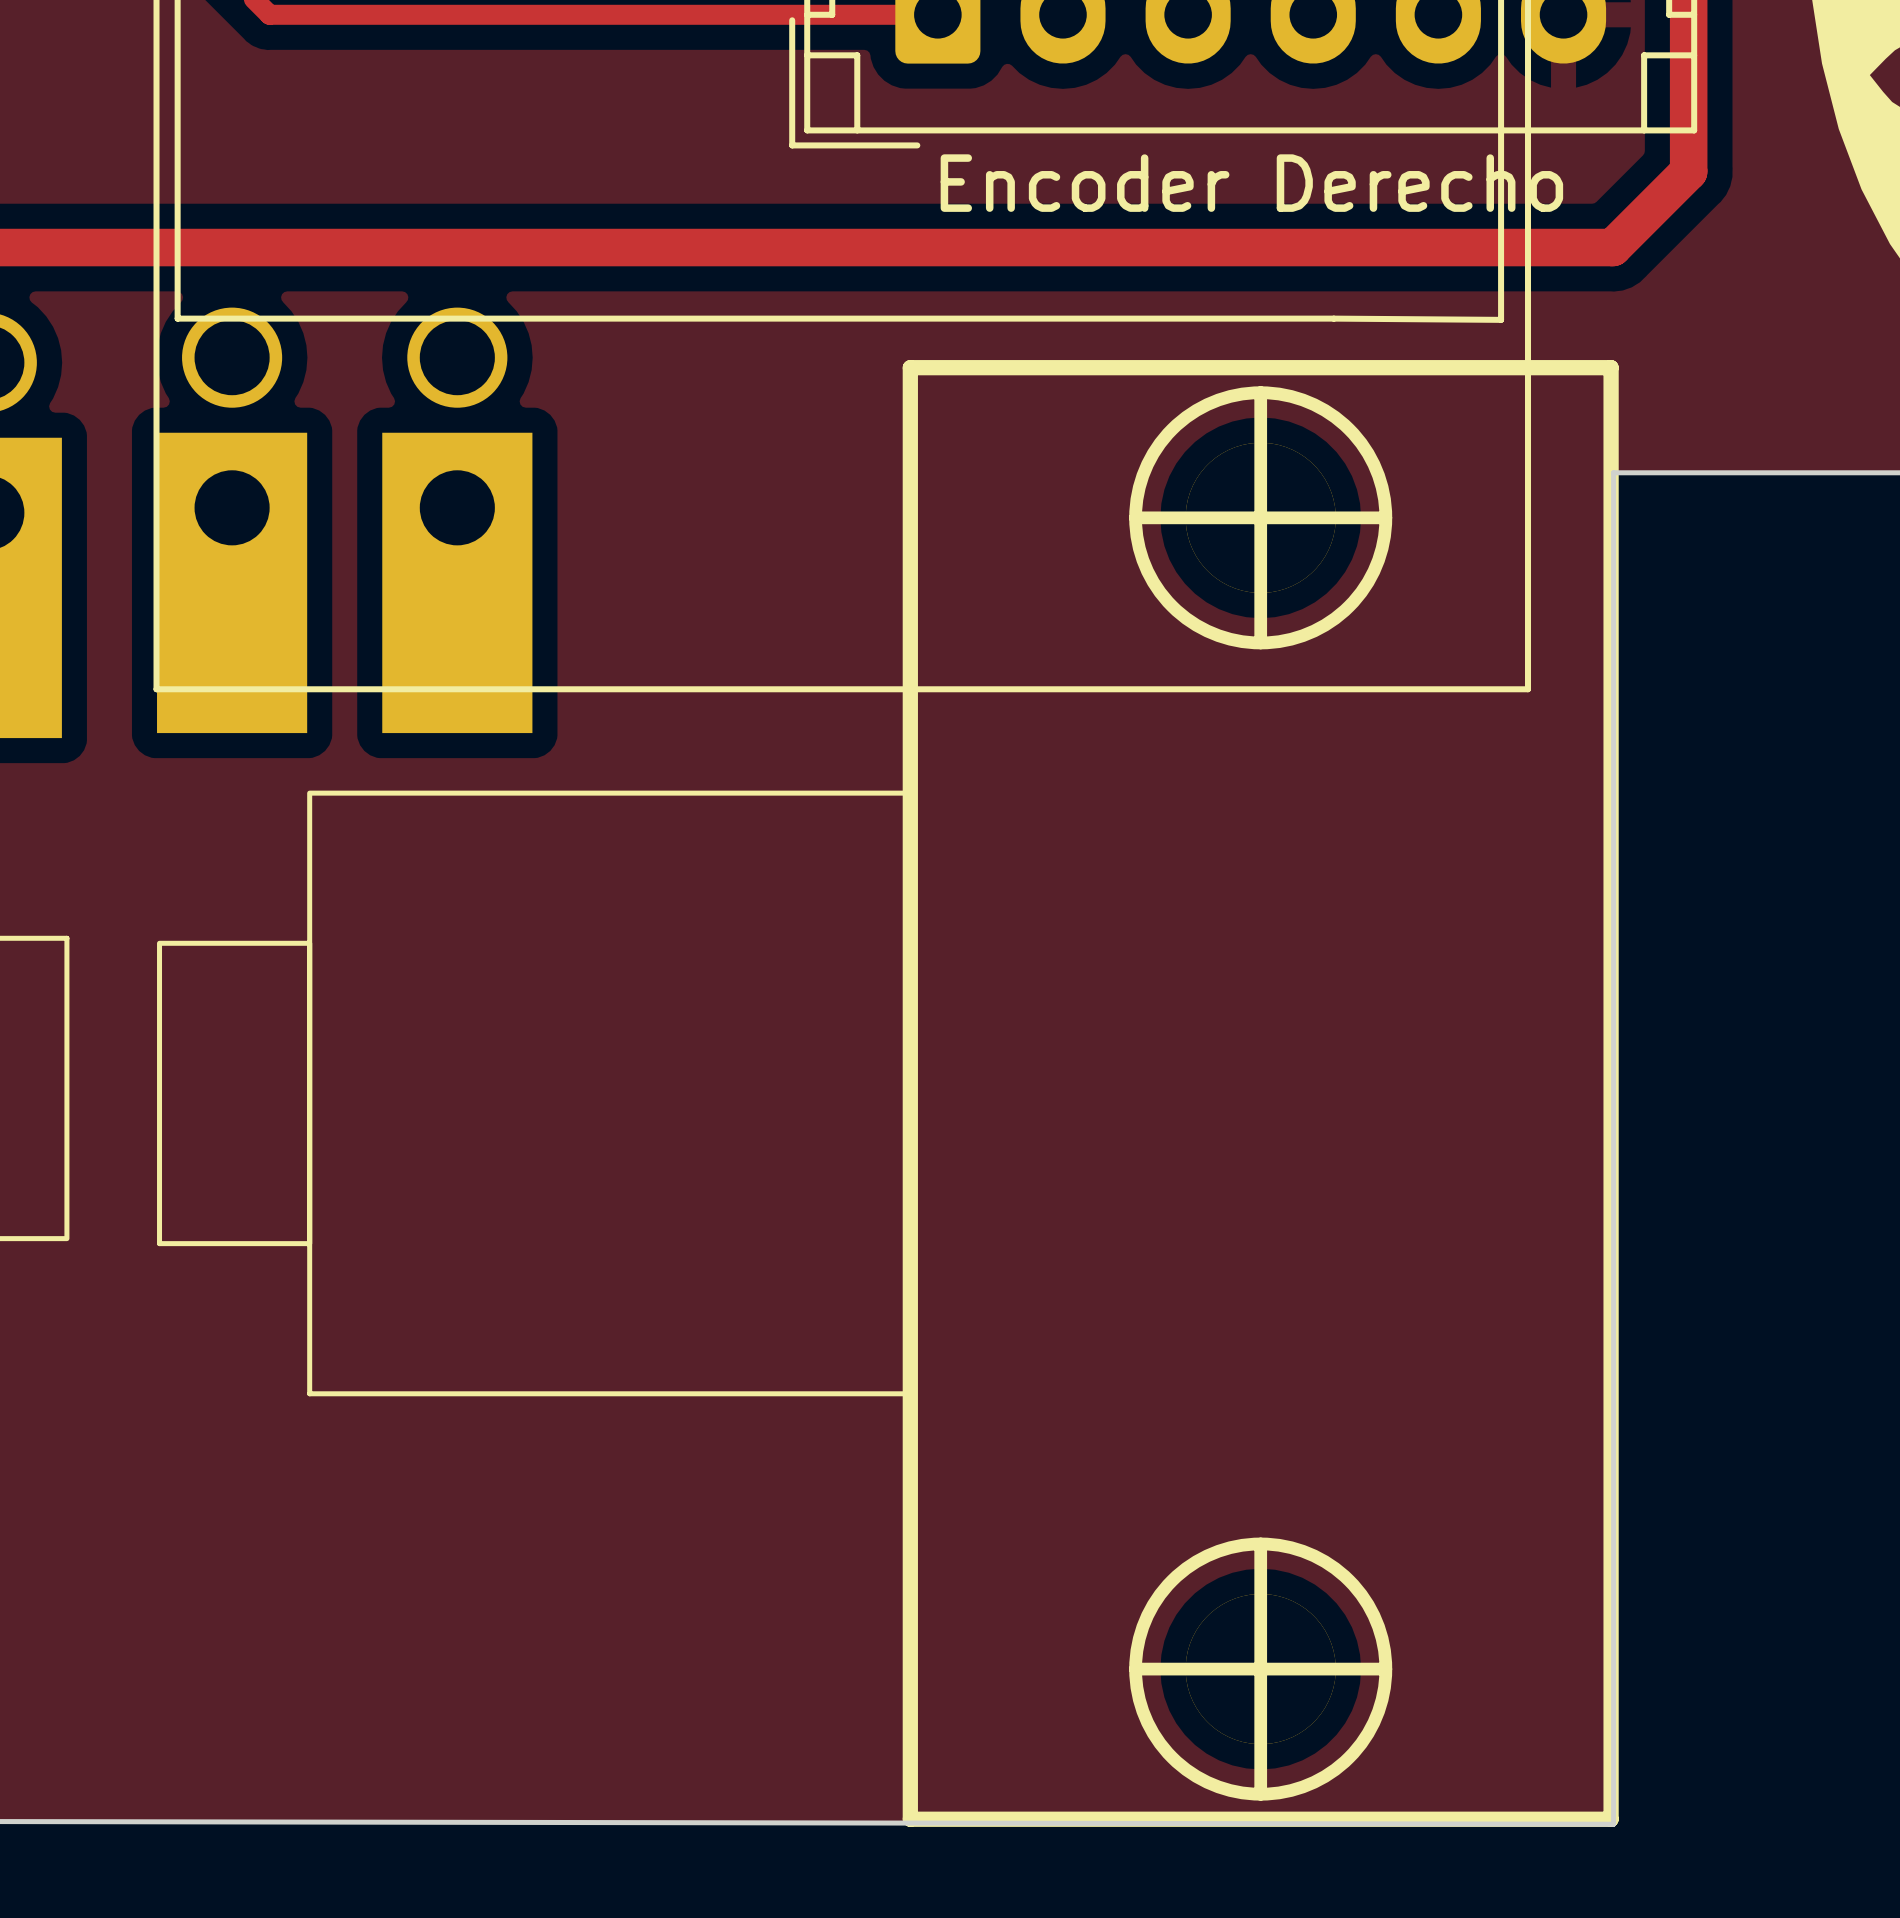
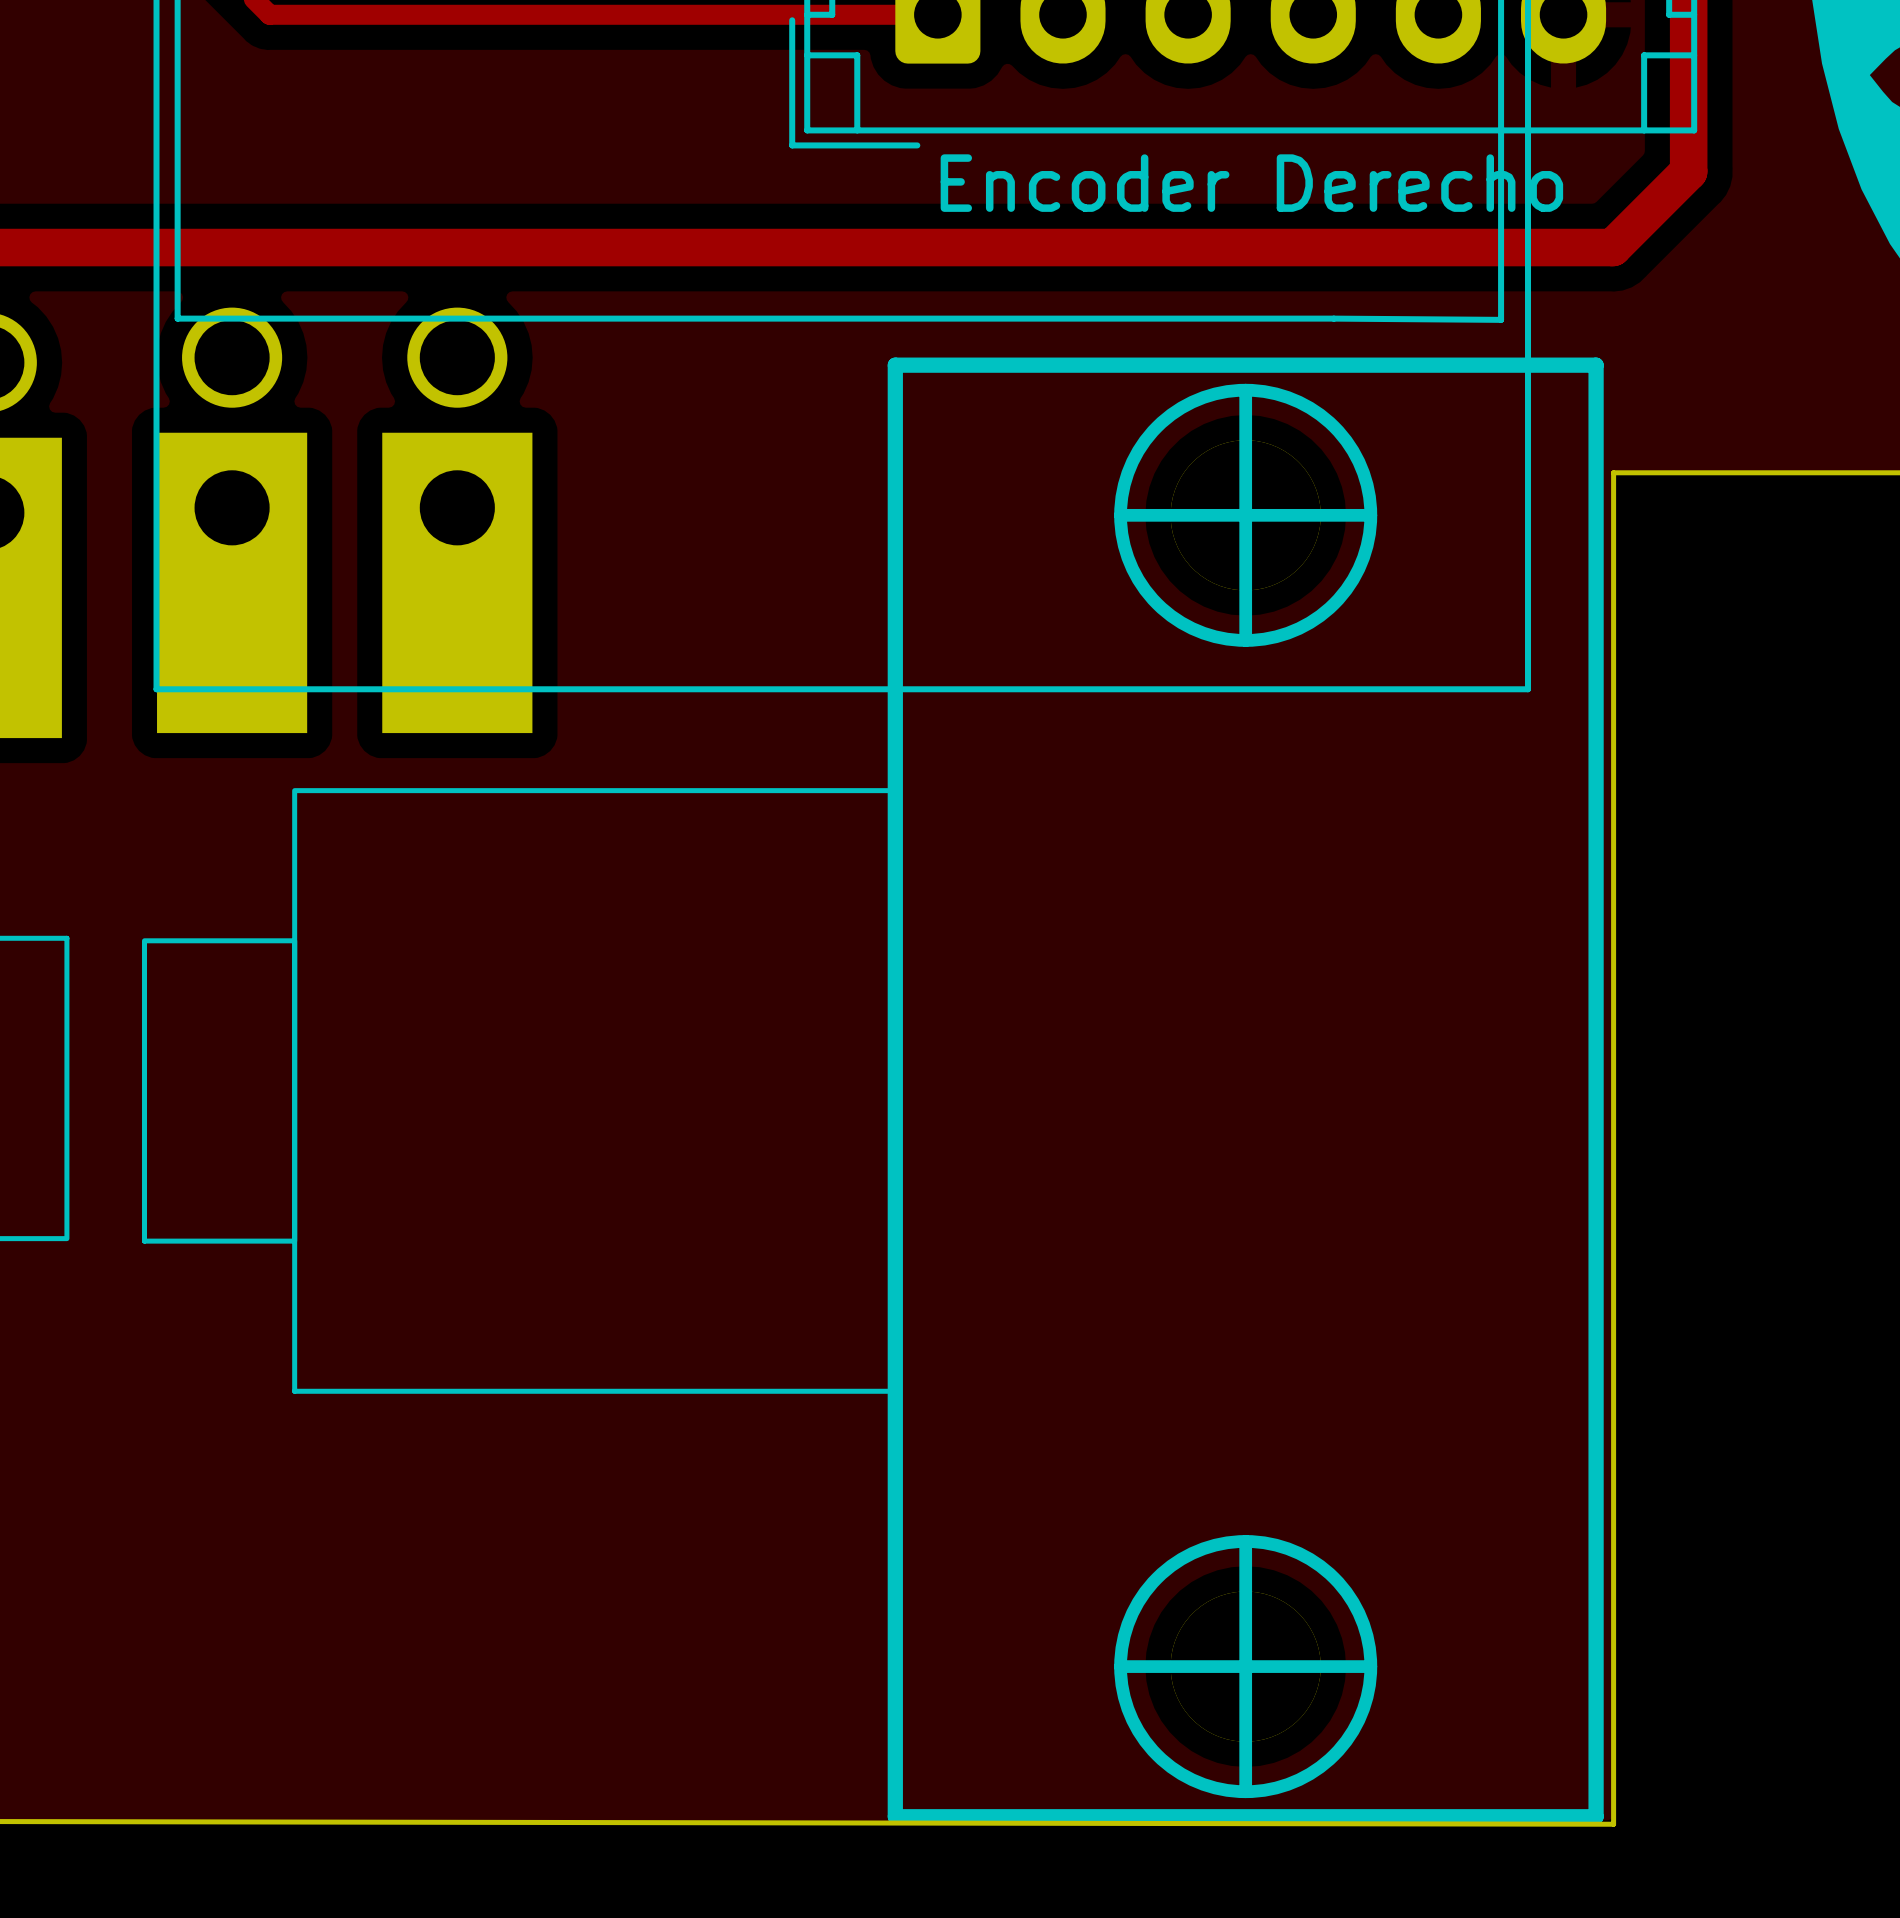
part position: (887, 1093) -> (872, 1090)

